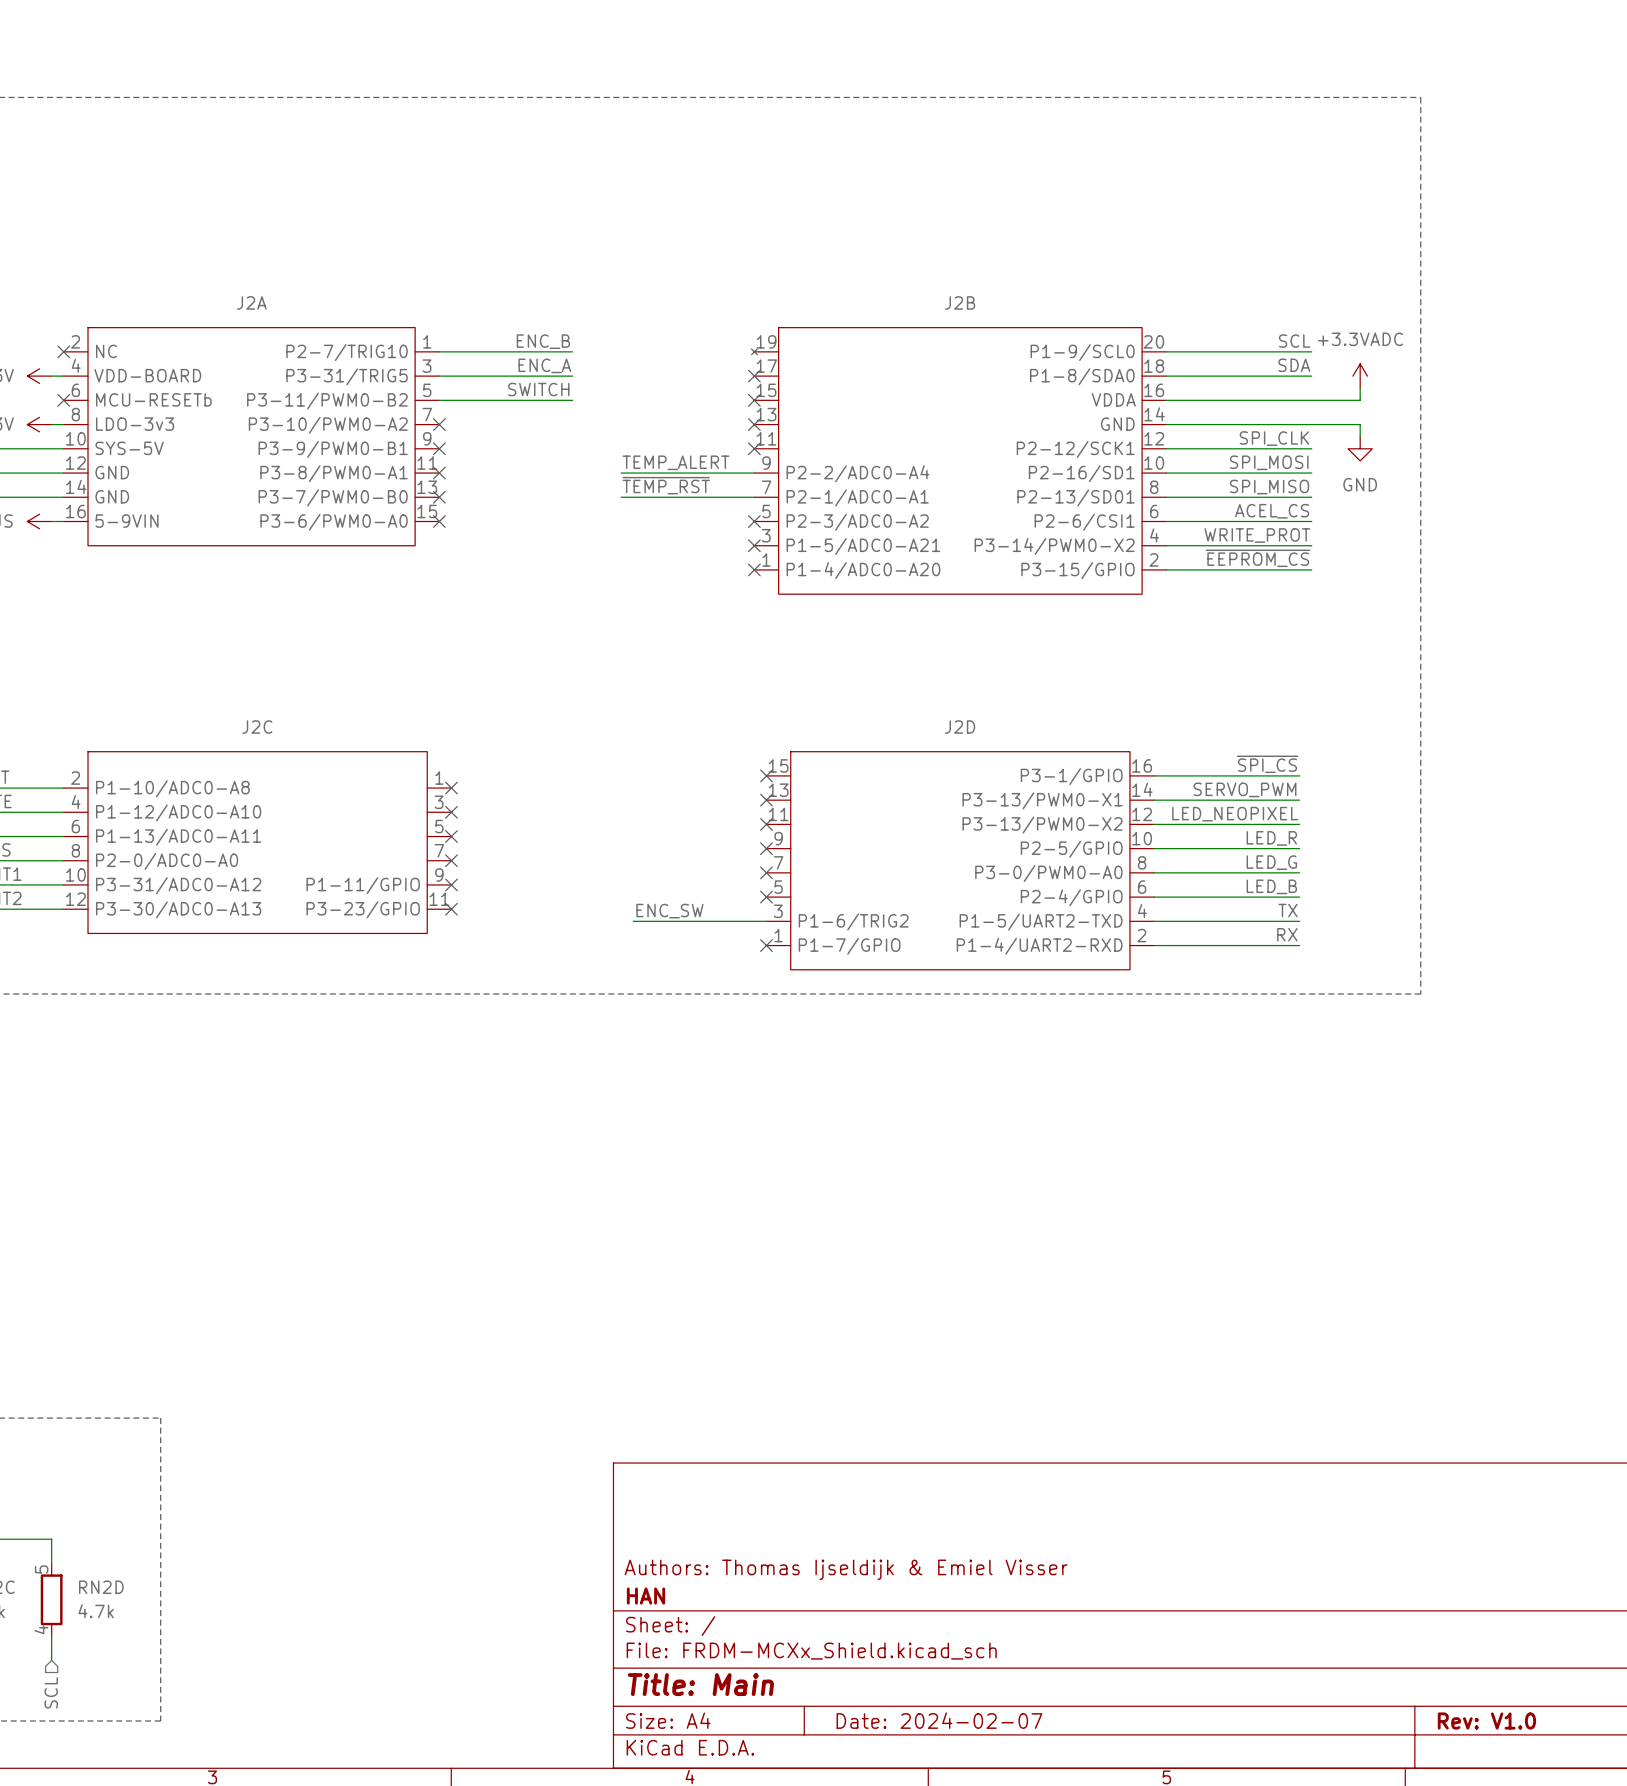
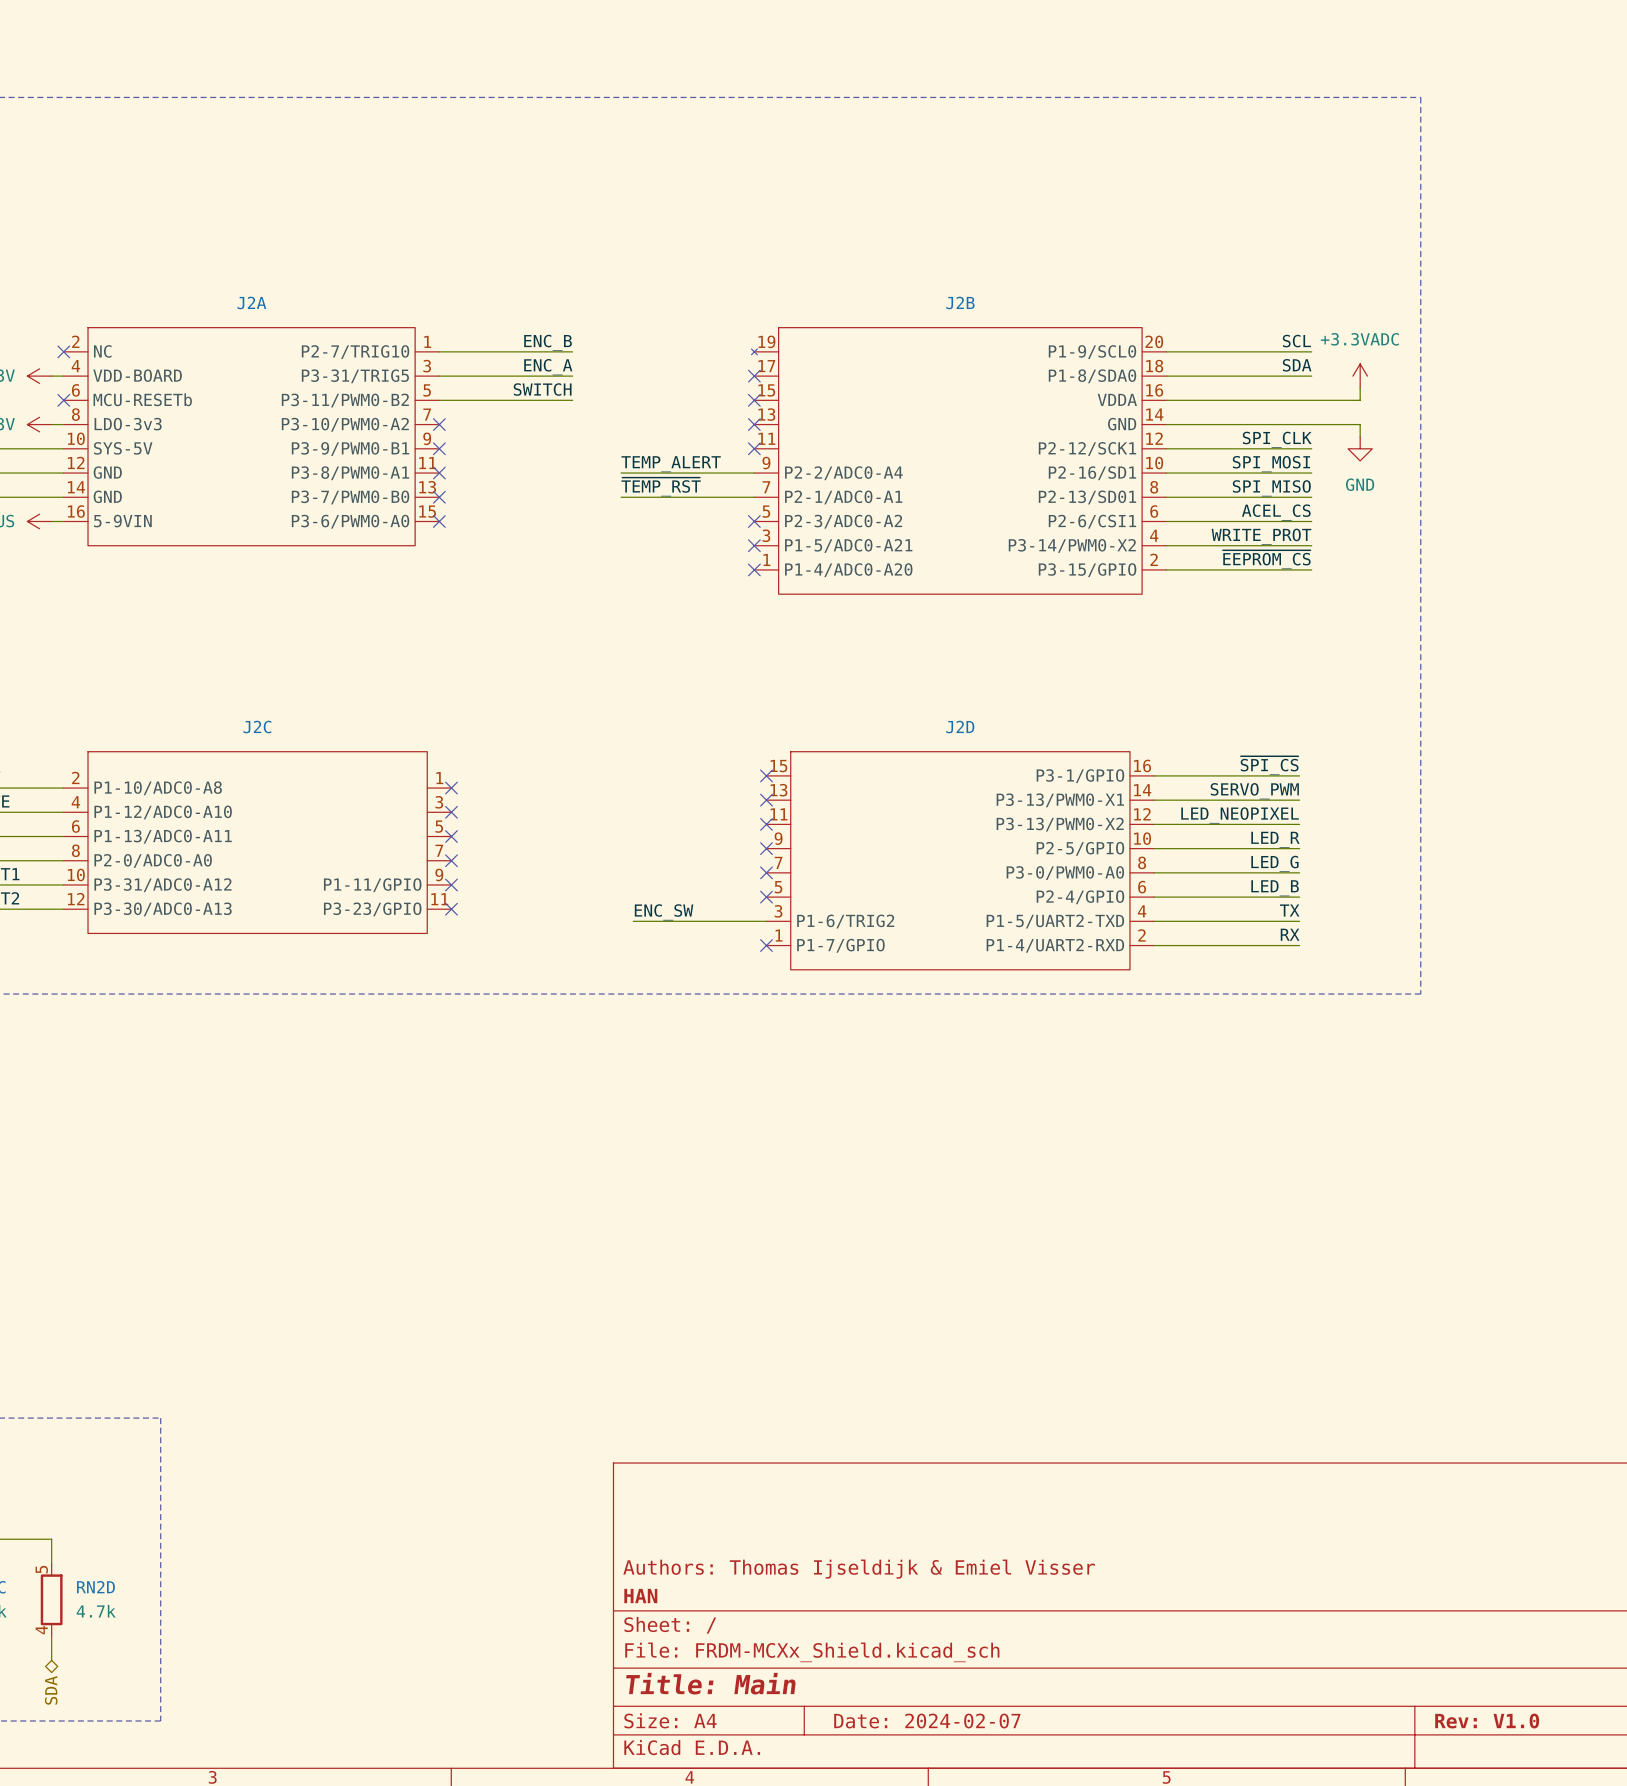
hierarchical label shape: input (51, 1692) -> bidirectional (51, 1690)
hierarchical label: SCL (51, 1692) -> SDA (51, 1690)

